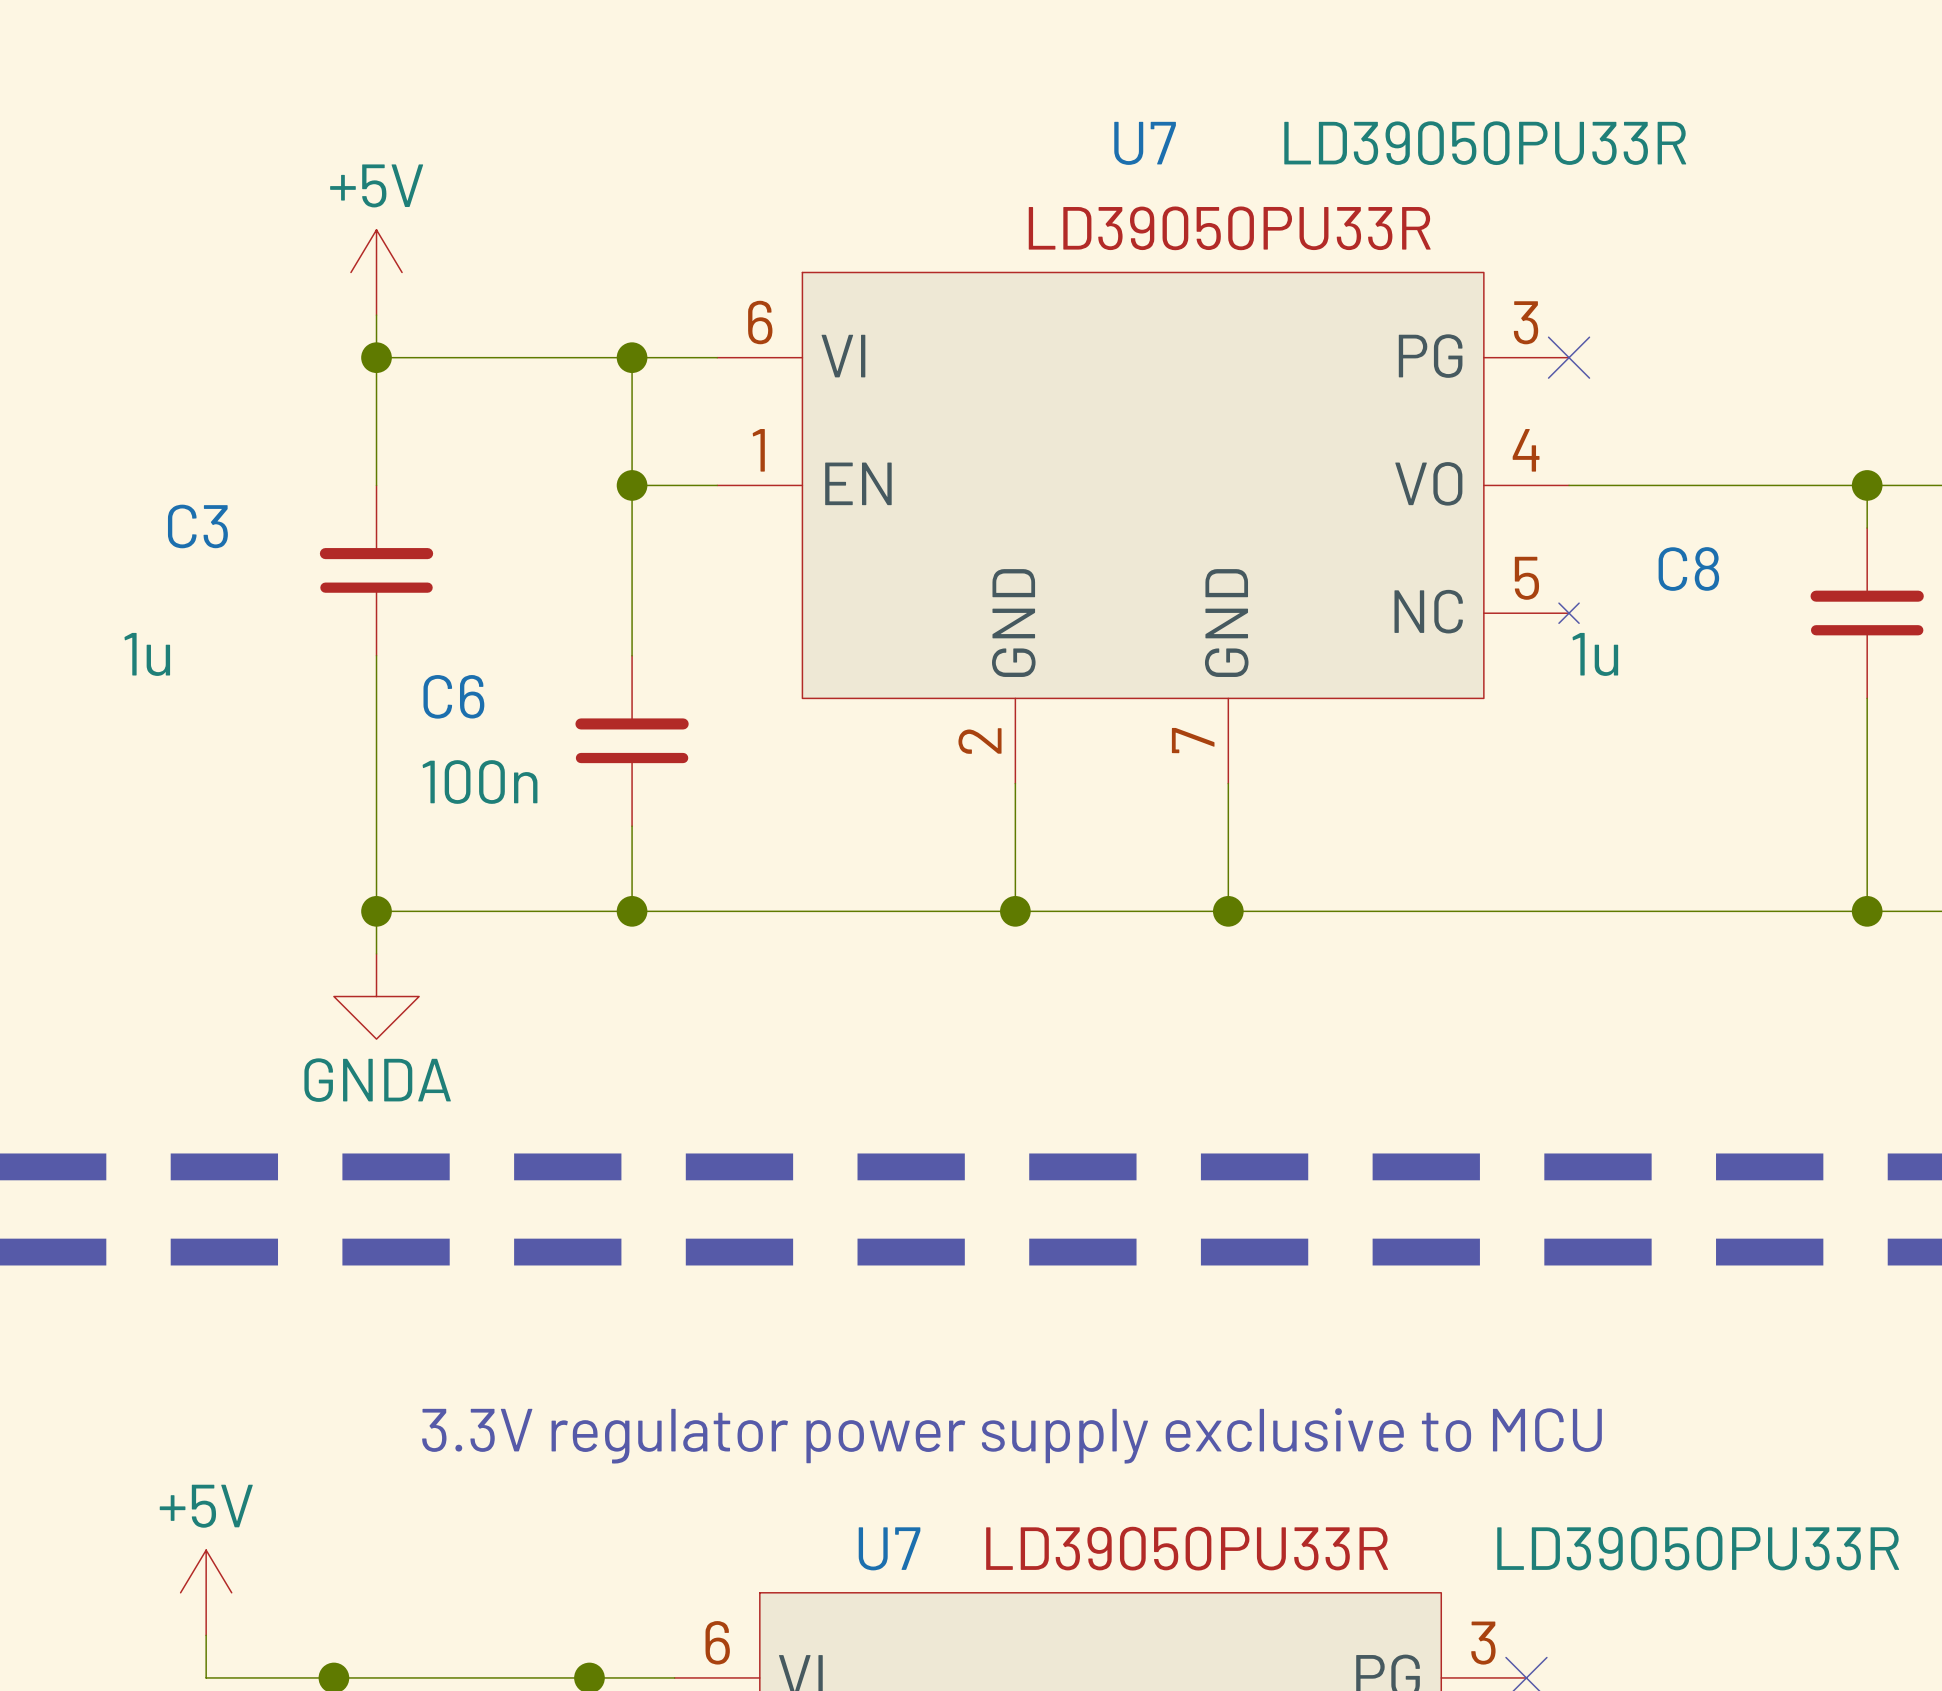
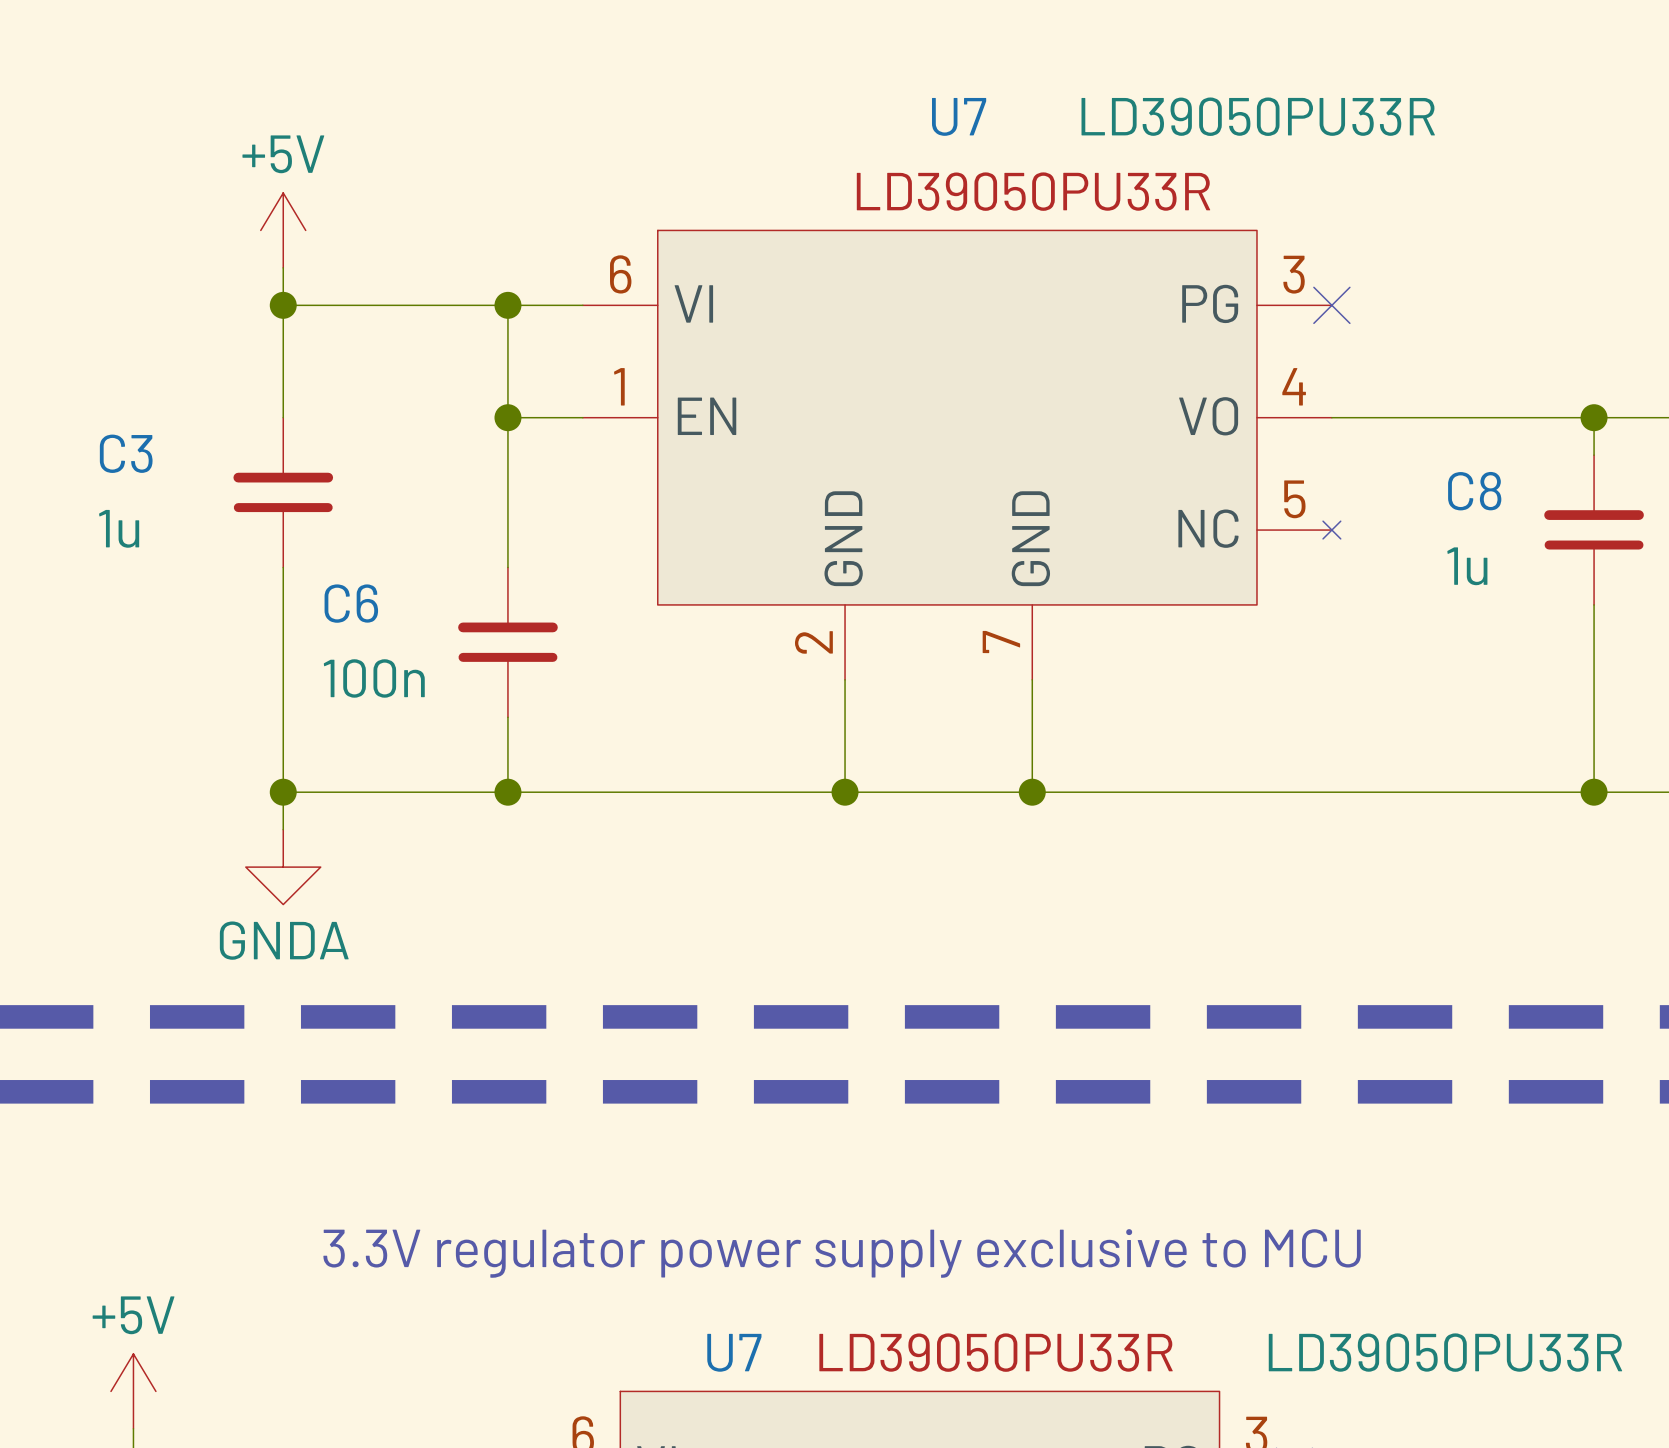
C8 name position: C8 (1688, 569) -> C8 (1474, 491)
C3 value position: 1u (147, 654) -> 1u (119, 528)
C8 value position: 1u (1595, 654) -> 1u (1467, 566)

